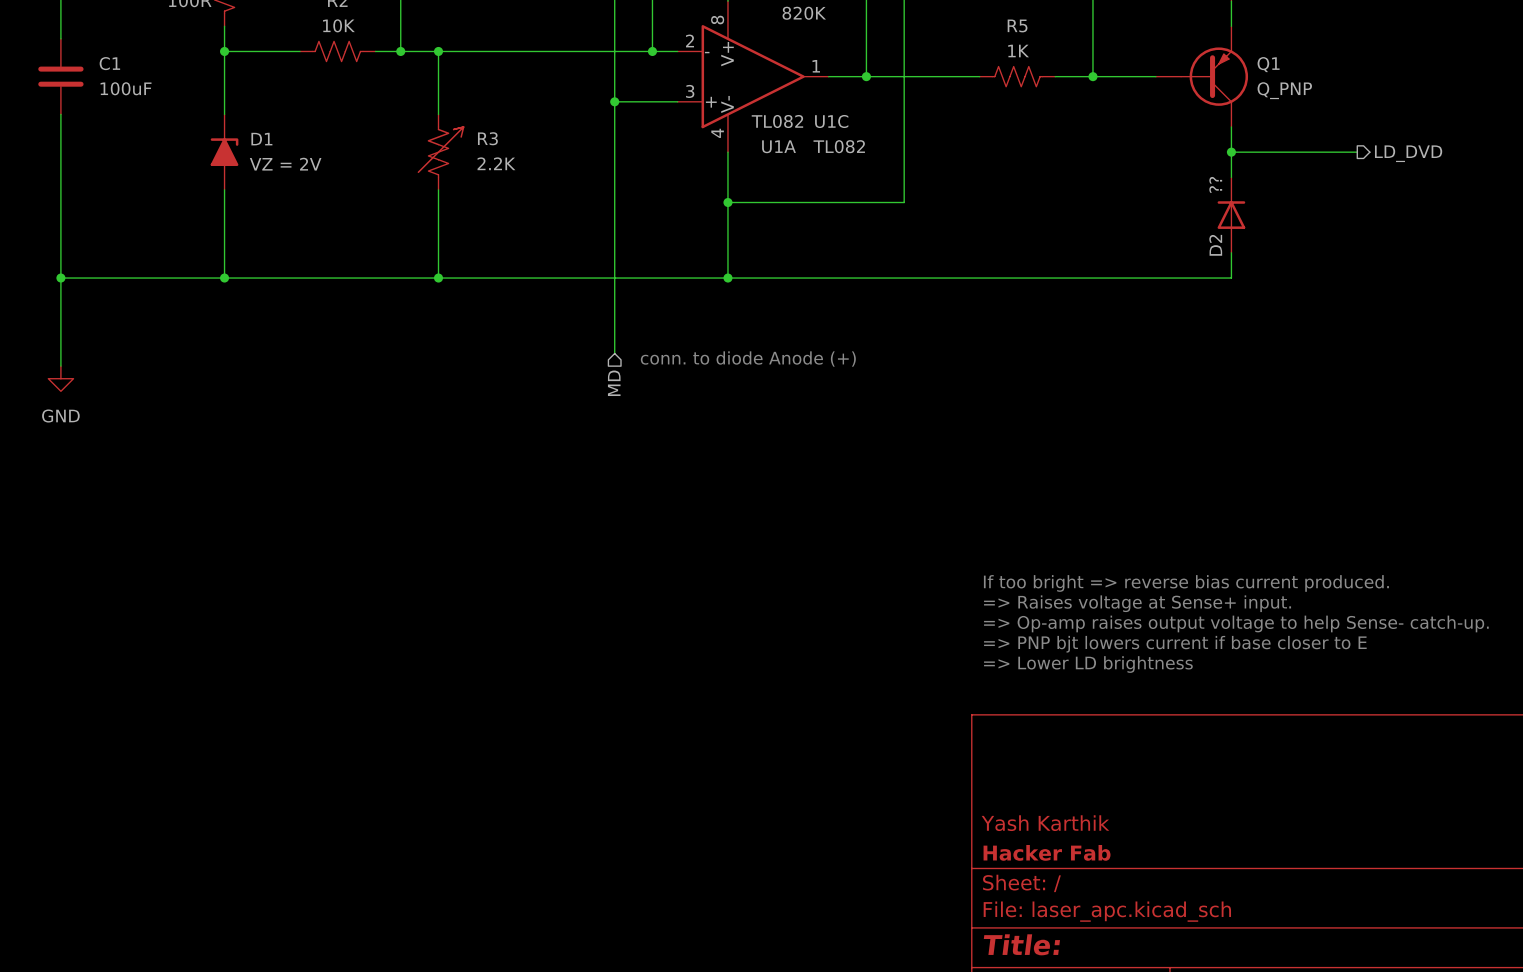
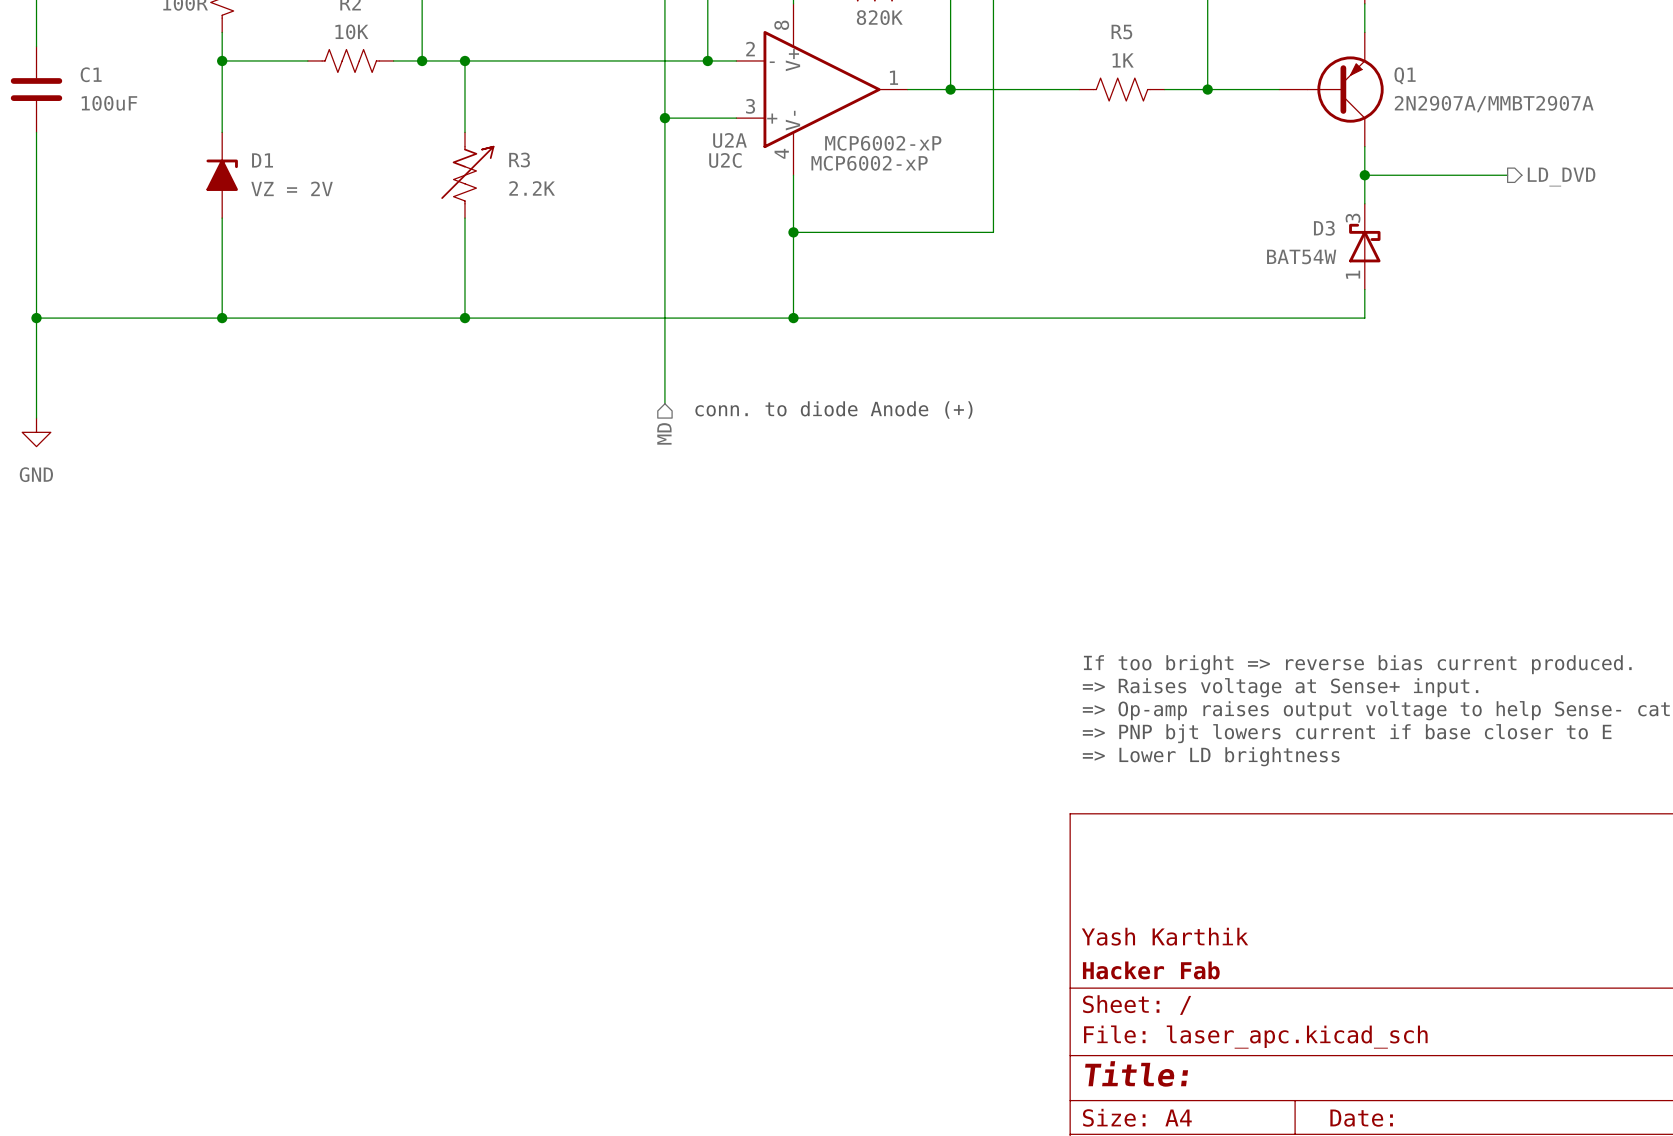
Q1 value: Q_PNP (1284, 90) -> 2N2907A/MMBT2907A (1494, 104)
U1A value: TL082 (777, 121) -> MCP6002-xP (883, 143)
U1C name: U1C (831, 121) -> U2C (725, 160)
U1A name: U1A (779, 146) -> U2A (729, 140)
U1C value: TL082 (839, 146) -> MCP6002-xP (869, 163)
D2: ?? (1231, 215) -> none
D3: none -> BAT54W (1364, 246)

